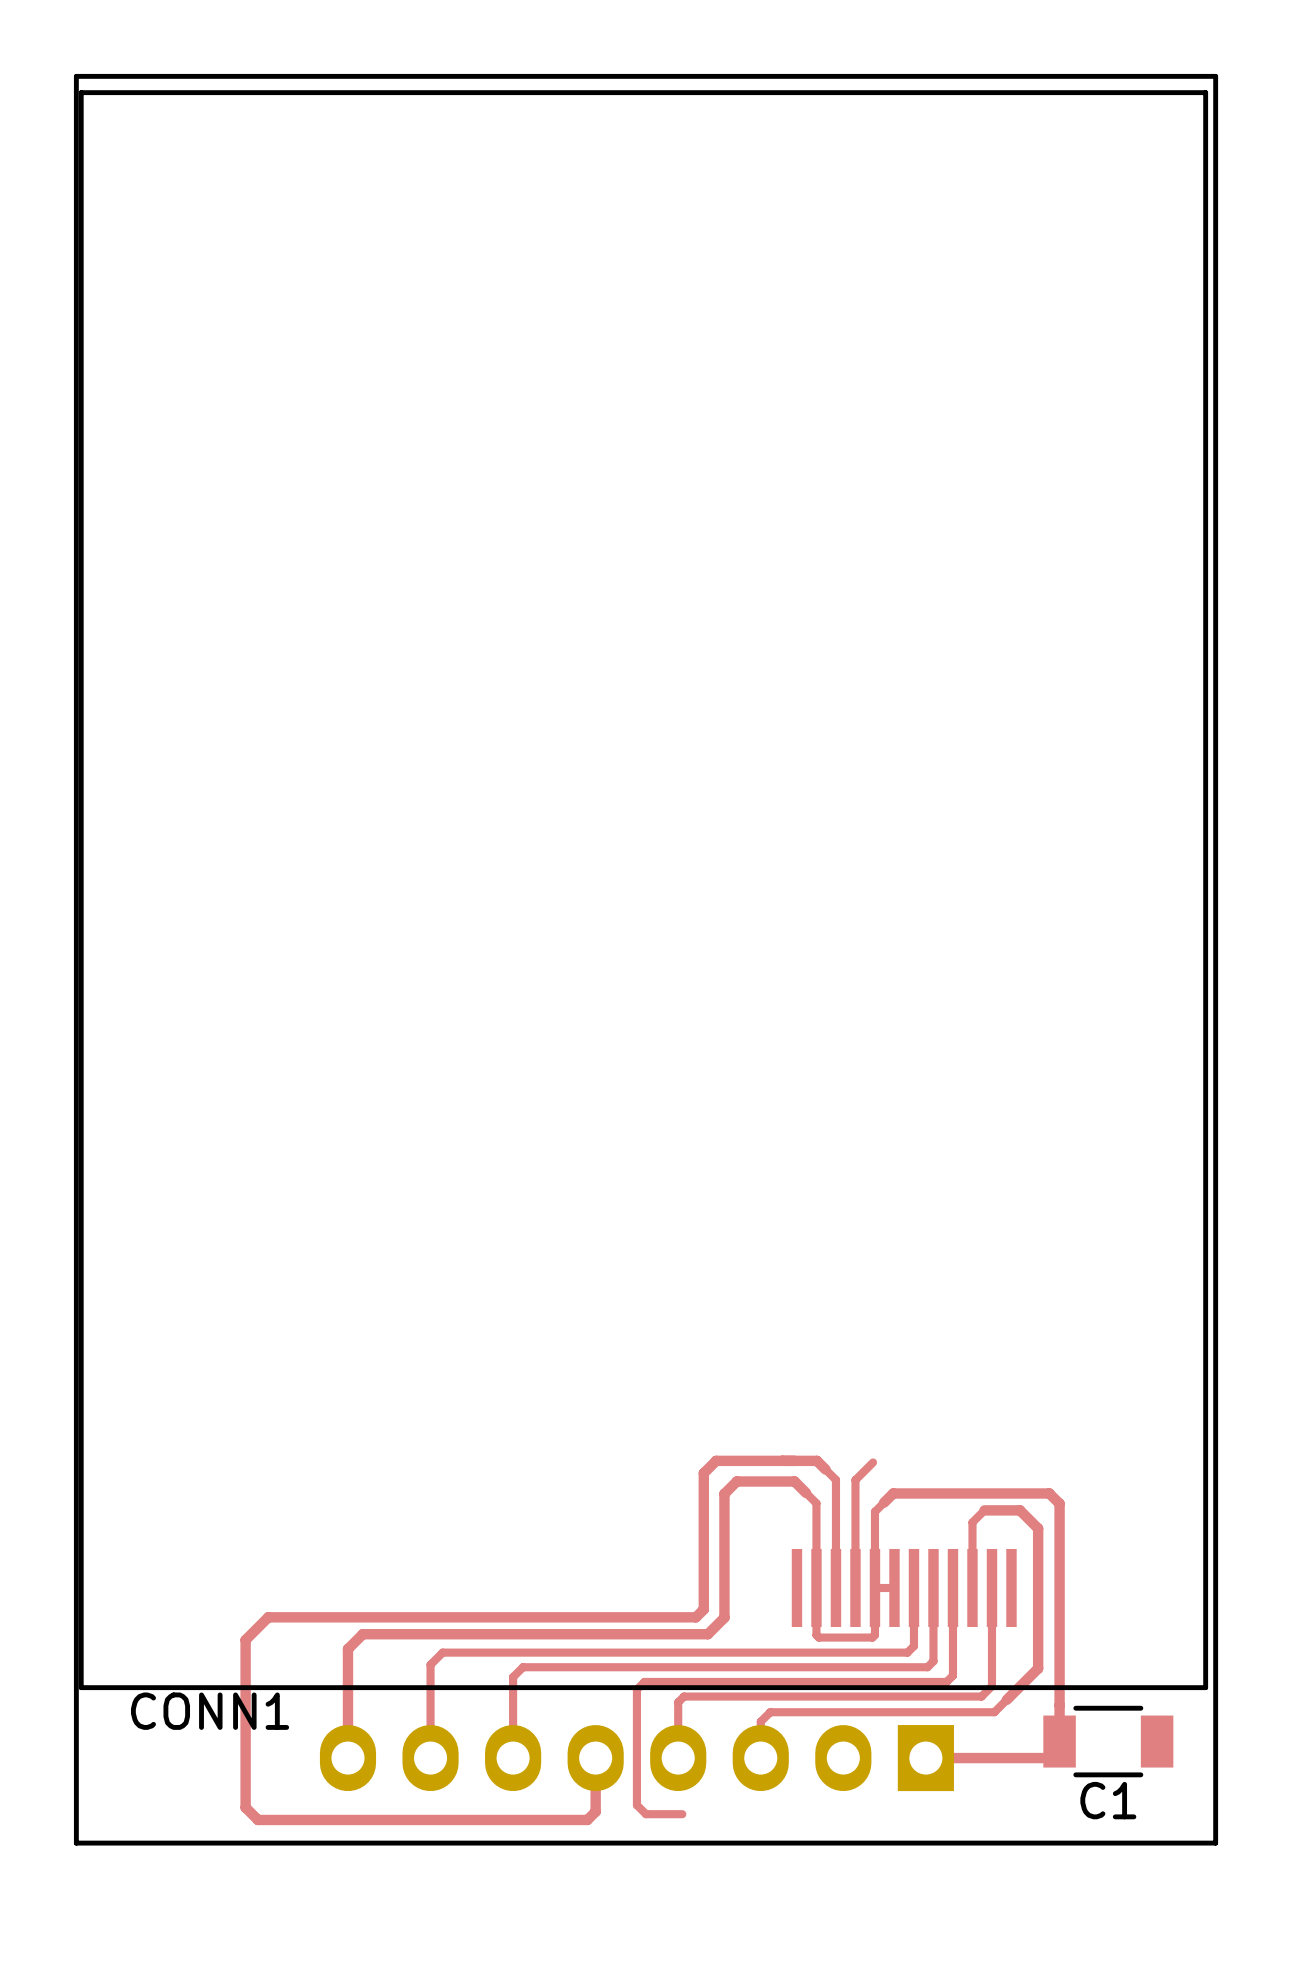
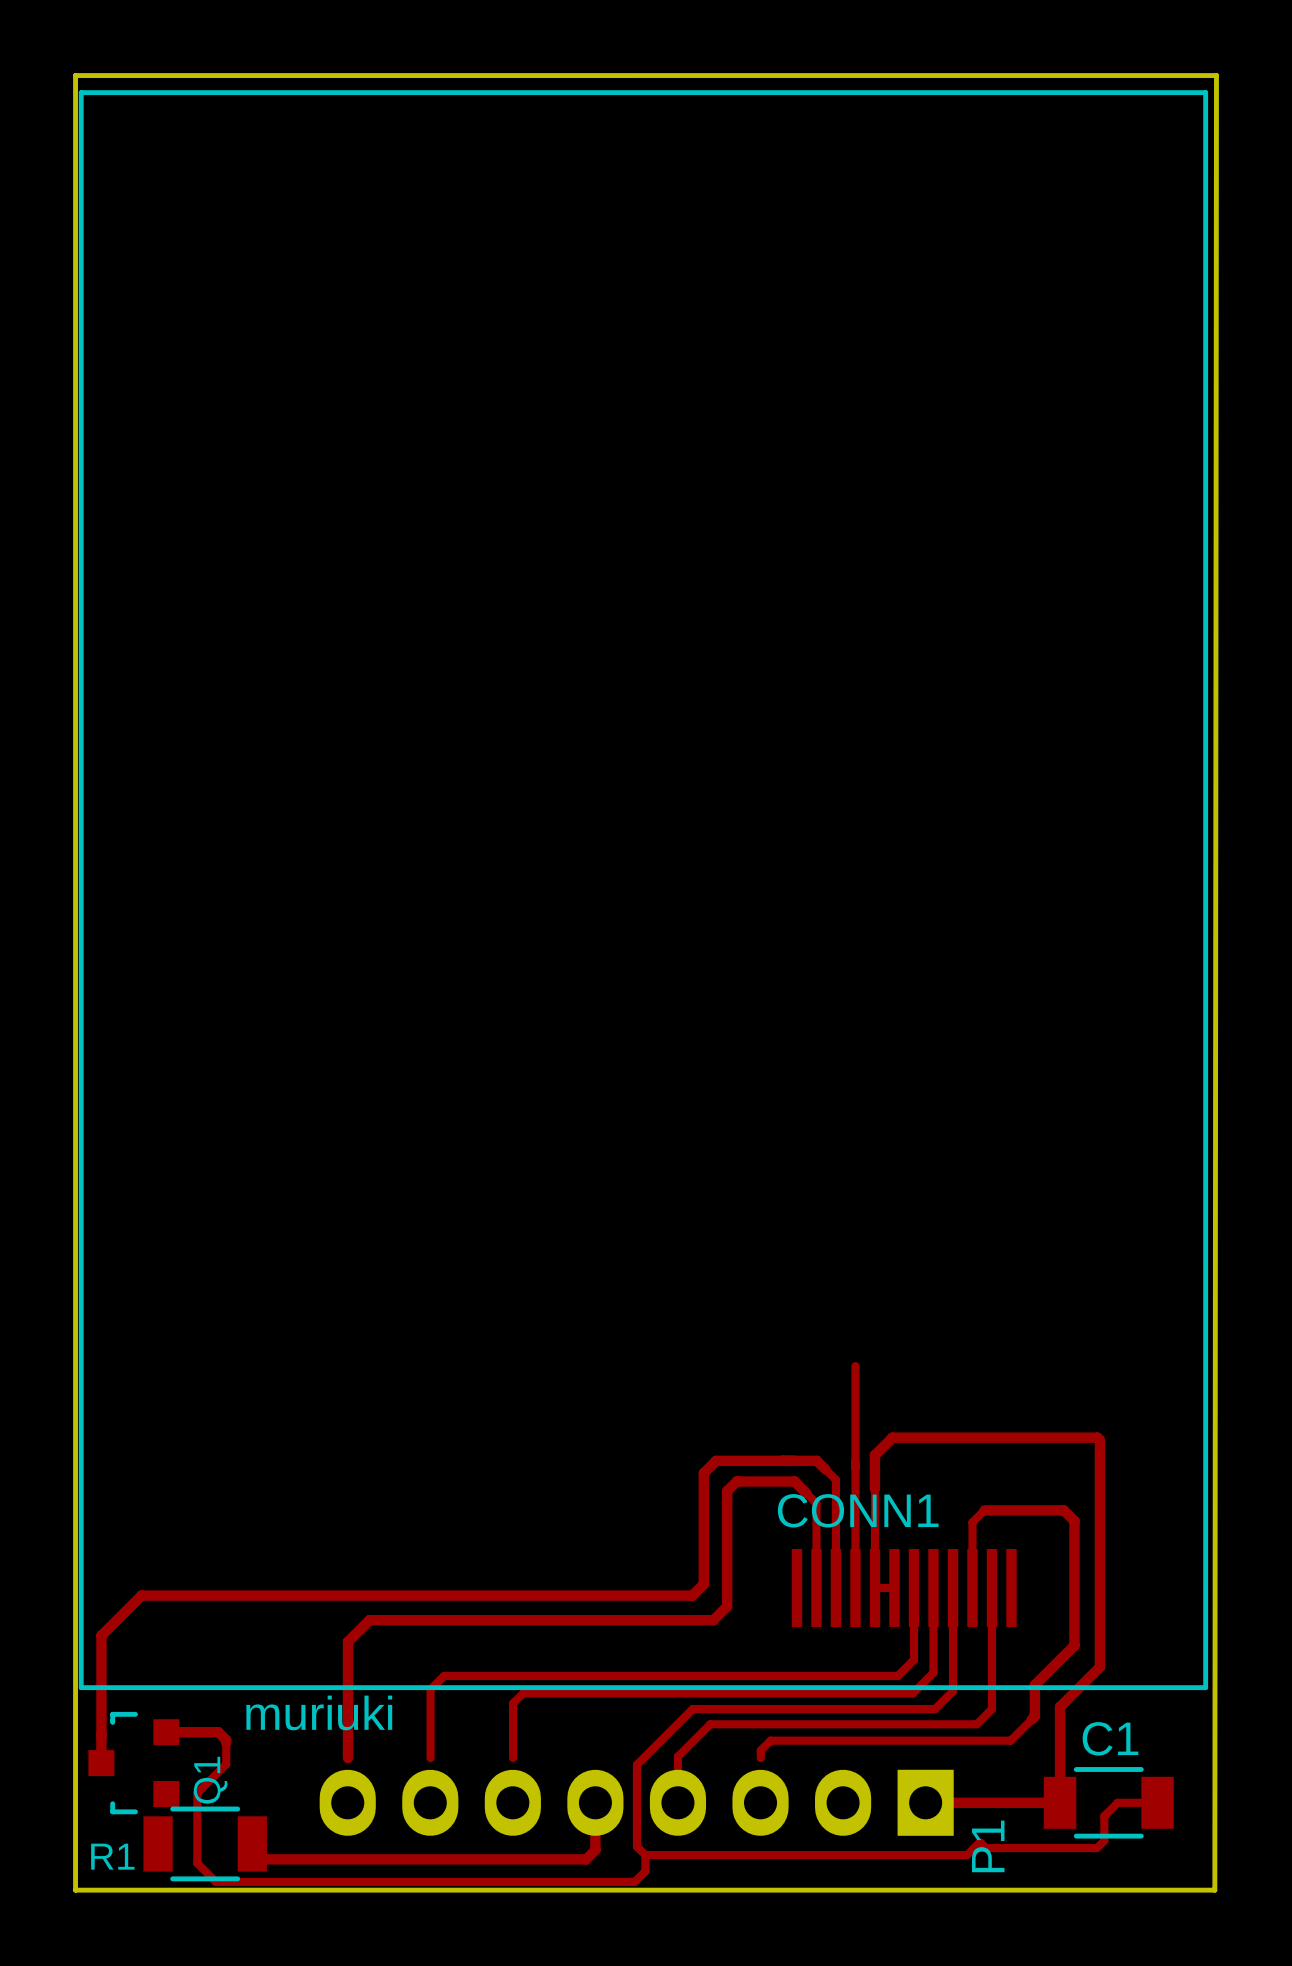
board edge: (76, 76) (1215, 76) (1215, 1843) (76, 1843) (76, 76) -> (75, 75) (75, 1890) (1214, 1890) (1216, 75) (75, 75)
track: (873, 1462) (855, 1480) -> (855, 1366) (855, 1480)
track: (727, 1491) (724, 1493) (724, 1617) (707, 1634) (362, 1634) (347, 1649) -> (727, 1491) (727, 1606) (713, 1620) (369, 1620) (347, 1641) (347, 1649)
track: (1020, 1510) (1038, 1528) (1038, 1668) (994, 1712) (770, 1712) (760, 1721) (760, 1750) -> (1020, 1510) (1063, 1510) (1074, 1521) (1074, 1645) (1034, 1685) (1034, 1716) (1010, 1740) (770, 1740) (760, 1750)
track: (874, 1511) (893, 1493) (1049, 1493) (1059, 1503) (1059, 1756) (1057, 1758) (925, 1758) -> (874, 1511) (874, 1455) (892, 1437) (1097, 1437) (1099, 1440) (1099, 1667) (1060, 1707) (1060, 1802) (925, 1802)
track: (703, 1584) (703, 1609) (695, 1617) (268, 1617) (245, 1640) (245, 1807) (258, 1819) (587, 1819) (595, 1811) (595, 1758) -> (703, 1584) (692, 1595) (141, 1595) (101, 1635) (101, 1763)
track: (816, 1587) (816, 1635) (818, 1637) (872, 1637) (874, 1635) (874, 1587) -> none
track: (913, 1646) (907, 1652) (442, 1652) (430, 1664) (430, 1689) -> (913, 1646) (913, 1659) (897, 1675) (444, 1675) (430, 1689)
track: (933, 1661) (927, 1667) (523, 1667) (513, 1677) (513, 1703) -> (933, 1661) (933, 1672) (912, 1693) (523, 1693) (513, 1703)
track: (952, 1675) (946, 1681) (644, 1681) (636, 1689) (636, 1764) -> (952, 1675) (952, 1691) (935, 1709) (692, 1709) (636, 1764)
track: (991, 1686) (981, 1696) (683, 1696) (678, 1702) (678, 1758) -> (991, 1686) (991, 1709) (976, 1724) (710, 1724) (677, 1756) (677, 1799)
CONN1 name position: CONN1 (210, 1711) -> CONN1 (858, 1510)
text: none -> muriuki (319, 1712)
track: none -> (166, 1732) (218, 1732) (226, 1740) (226, 1764) (197, 1793) (197, 1863) (215, 1881) (634, 1881) (645, 1871) (645, 1855)
C1 position: (1108, 1741) -> (1108, 1802)
part: (636, 1758) -> none
Q1: none -> (133, 1763)
C1 name position: C1 (1108, 1800) -> C1 (1110, 1738)
track: none -> (595, 1802) (595, 1850) (586, 1859) (246, 1859)
P1: none -> (636, 1802)
track: none -> (1157, 1802) (1117, 1802) (1104, 1816) (1104, 1840) (1097, 1848) (986, 1848) (979, 1842) (967, 1855) (645, 1855)
track: (636, 1805) (646, 1814) (682, 1814) -> (636, 1805) (636, 1846) (645, 1855)
R1: none -> (205, 1843)

